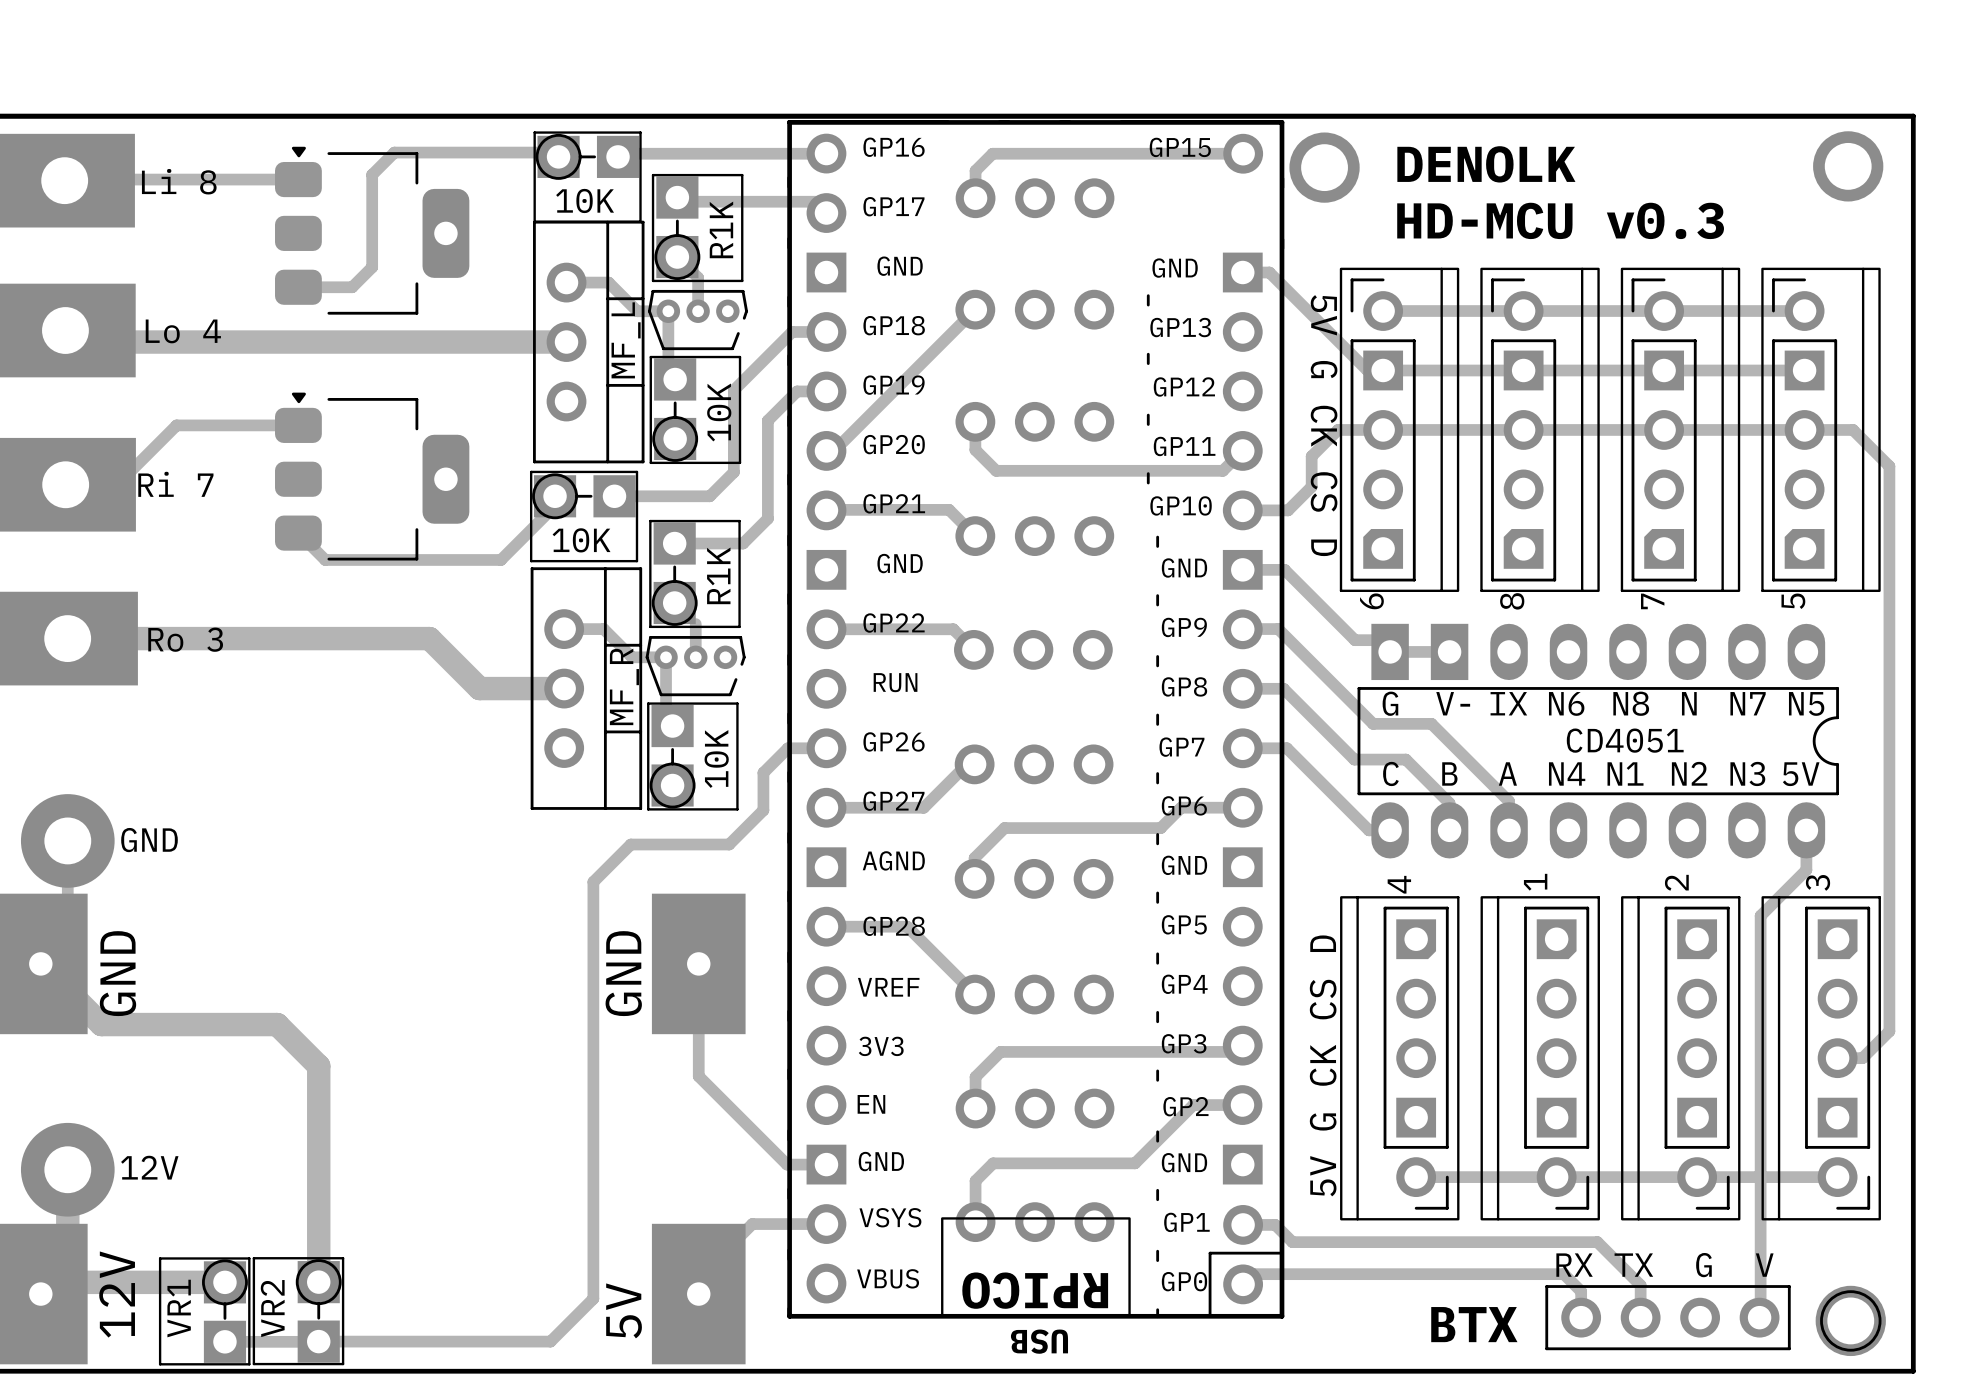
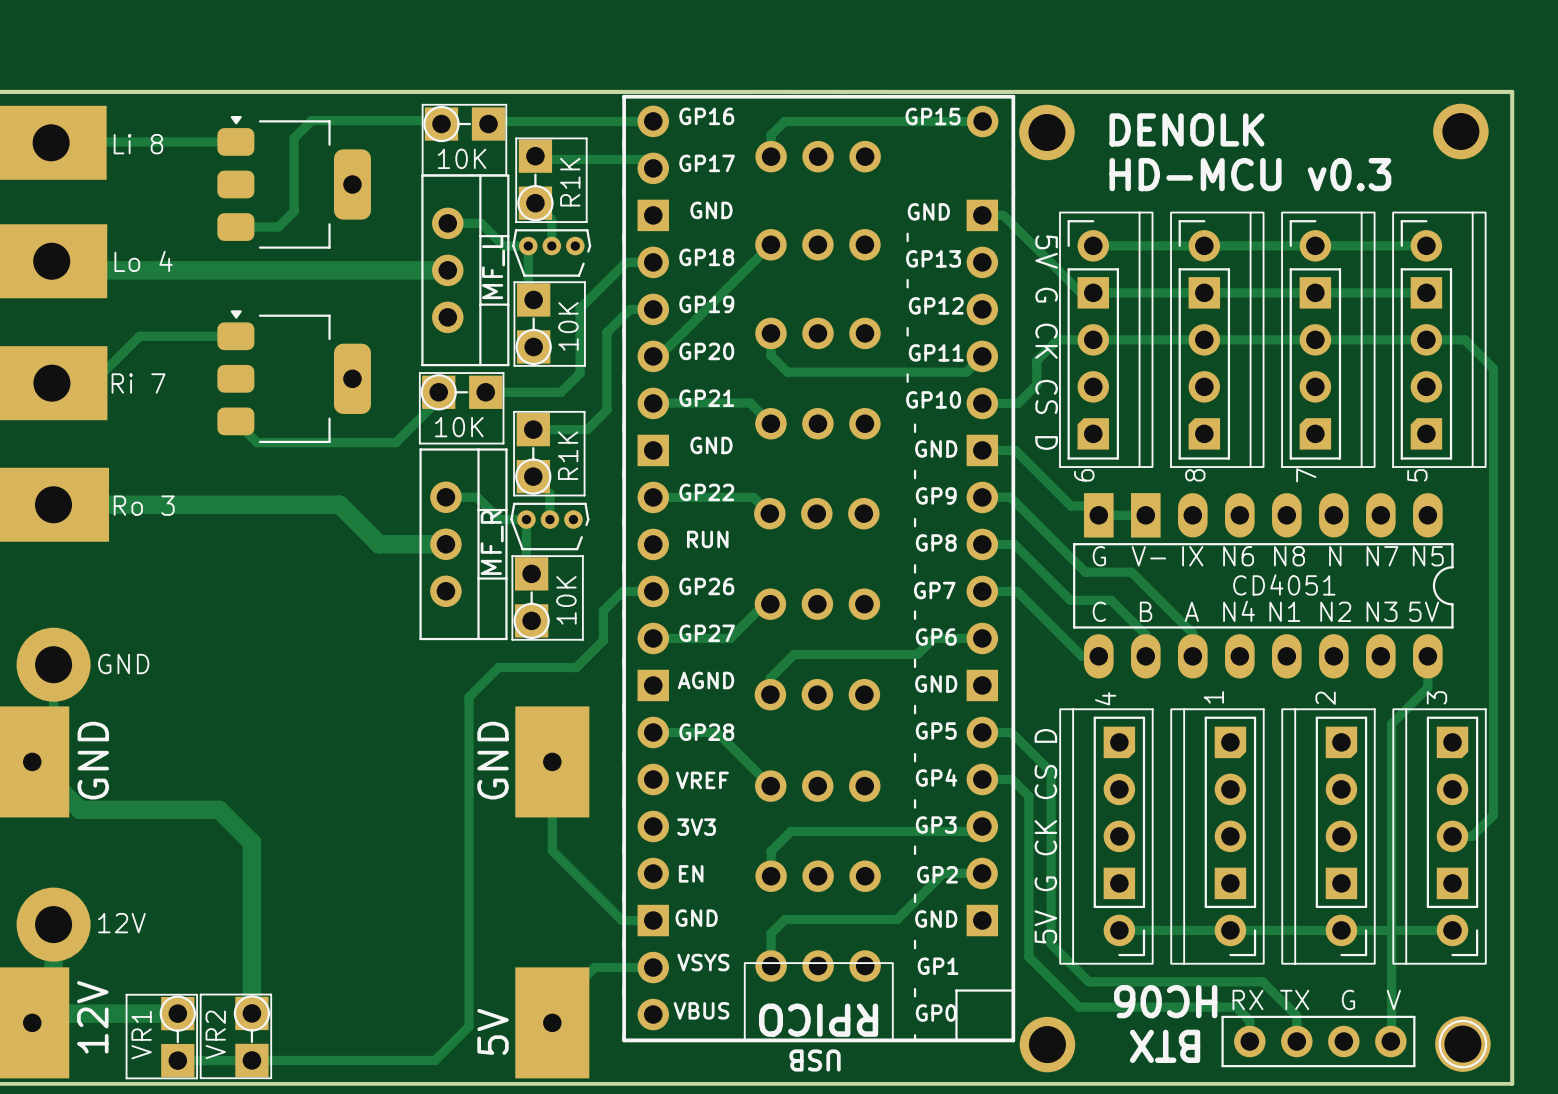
part footprint: [787, 120, 1285, 1319] -> [622, 94, 1016, 1042]
track: (1243, 1224) (1275, 1224) (1292, 1242) (1377, 1242) -> (982, 732) (1011, 732) (1051, 772) (1051, 944) (1088, 981)
text: none -> HC06 (1165, 1001)
track: (1364, 1274) (1253, 1274) (1243, 1284) -> (1078, 1007) (1028, 957) (1028, 796) (1012, 779) (982, 779)
part: none -> (1047, 1044)
text rotation: 0° (1474, 1324) -> 180° (1165, 1046)

